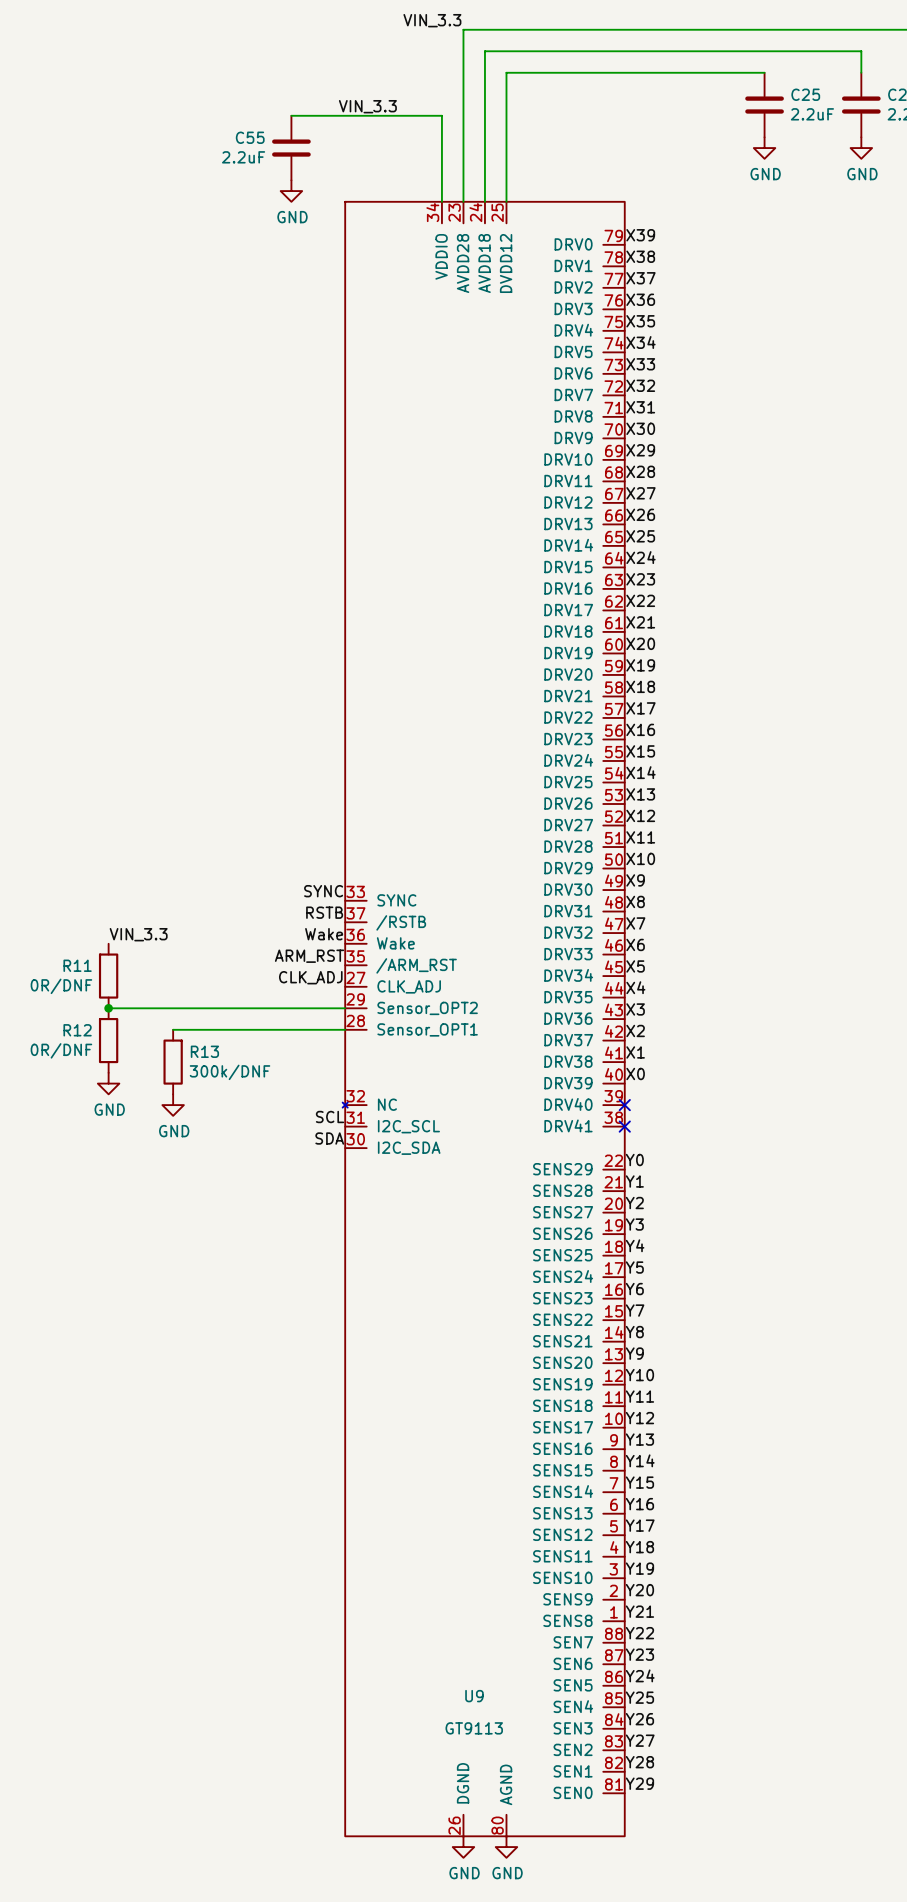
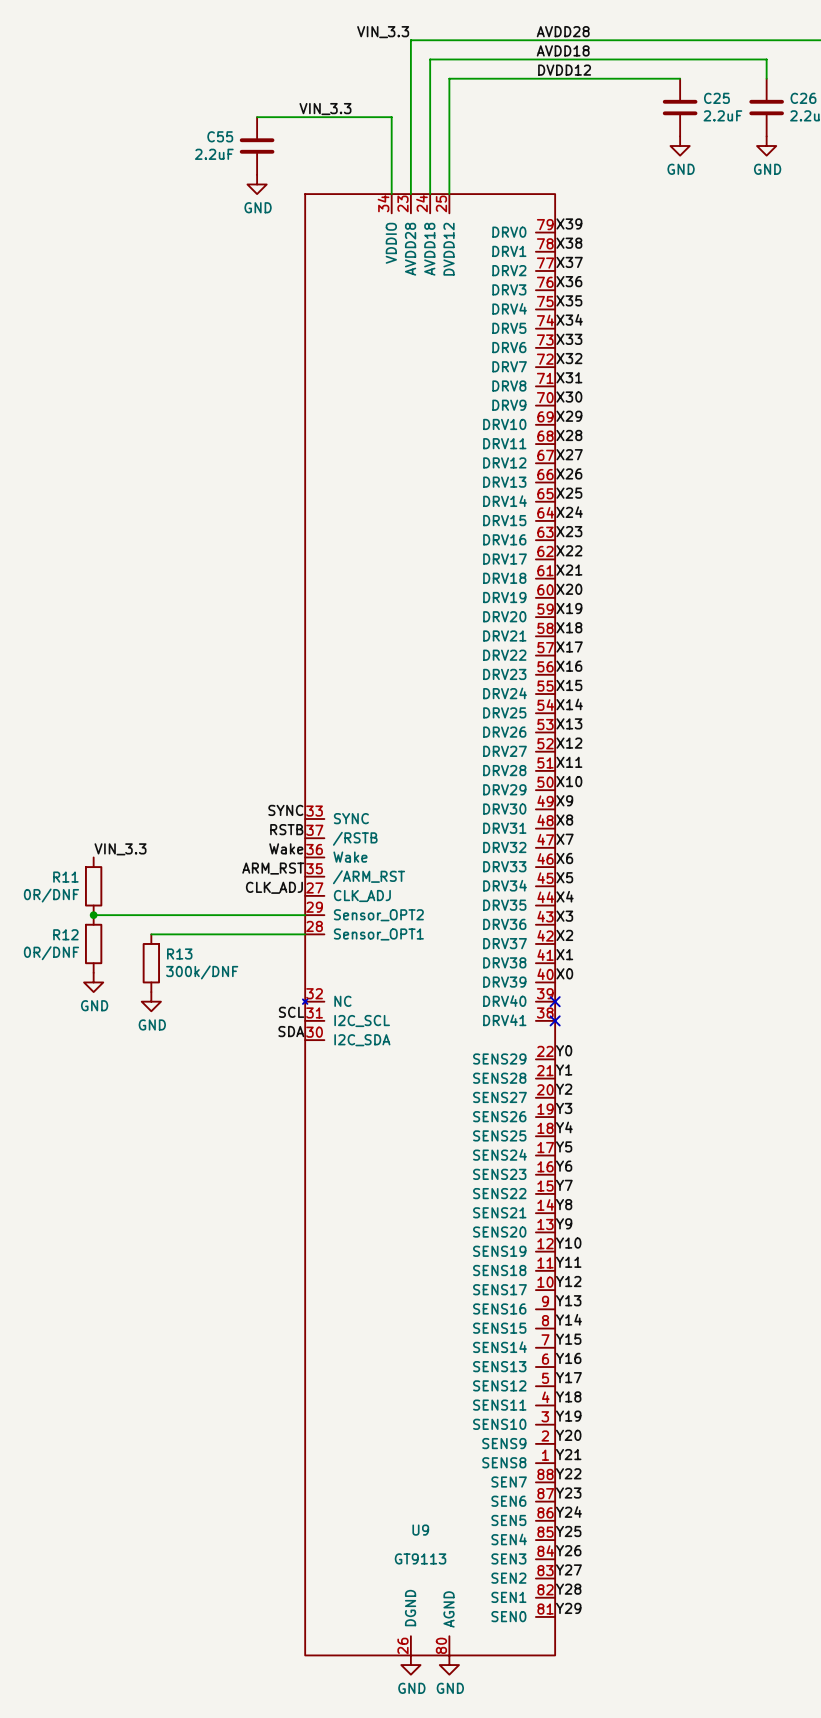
label: none -> AVDD28 (563, 31)
label: none -> AVDD18 (563, 50)
label: none -> DVDD12 (564, 70)

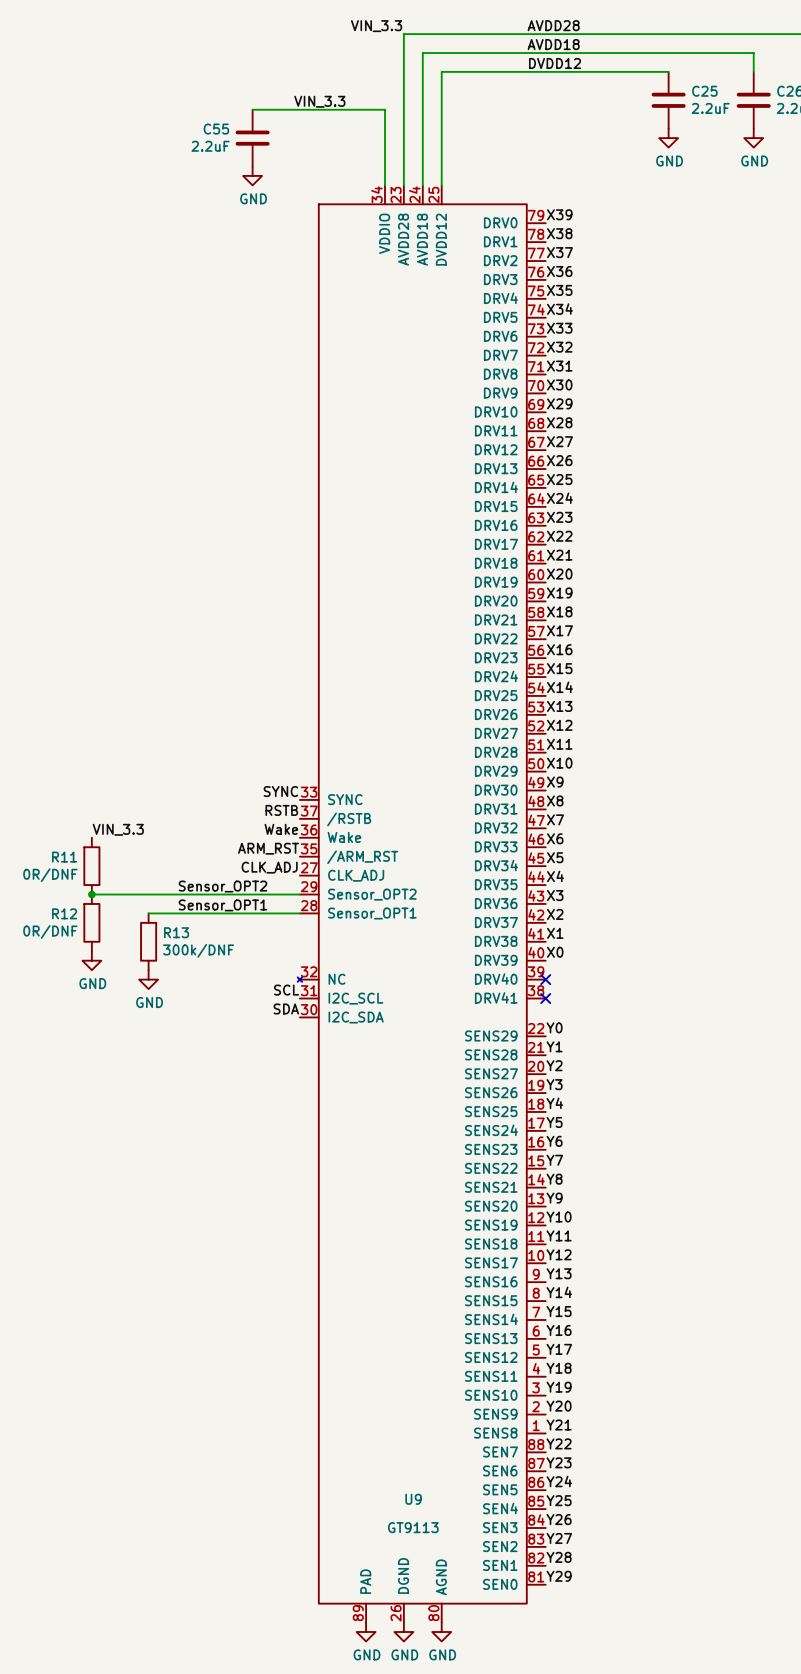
U9 symbol: [302, 194, 556, 1656] -> [297, 185, 546, 1623]
label: none -> Sensor_OPT2 (222, 886)
label: none -> Sensor_OPT1 (222, 905)
power symbol: none -> GND (366, 1632)

